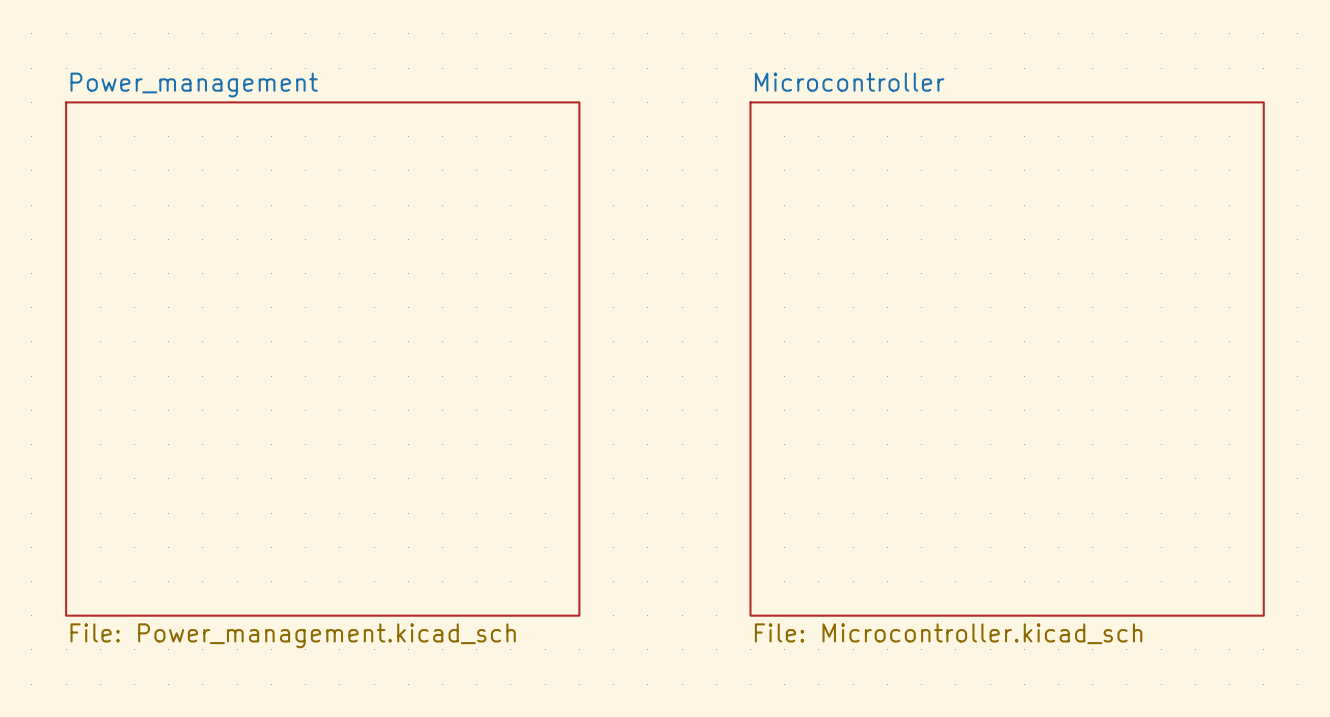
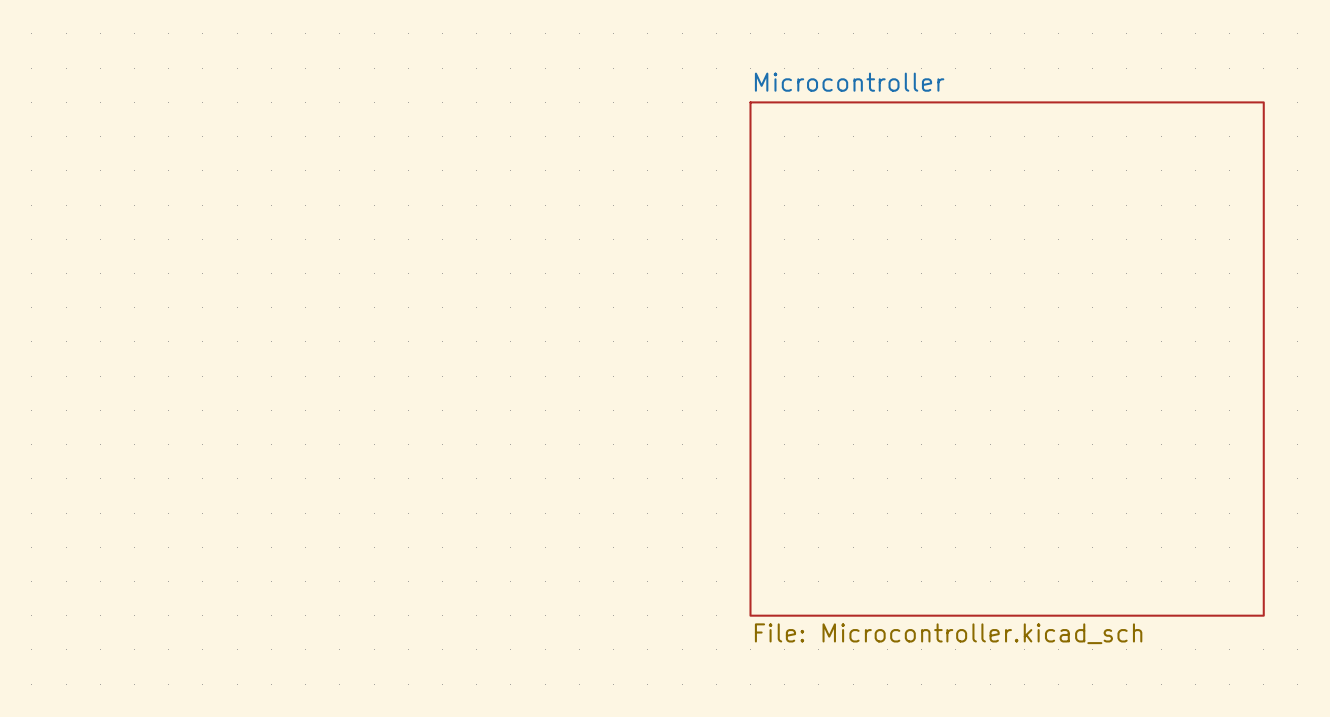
sheet Power_management: File: Power_management.kicad_sch (322, 359) -> none

